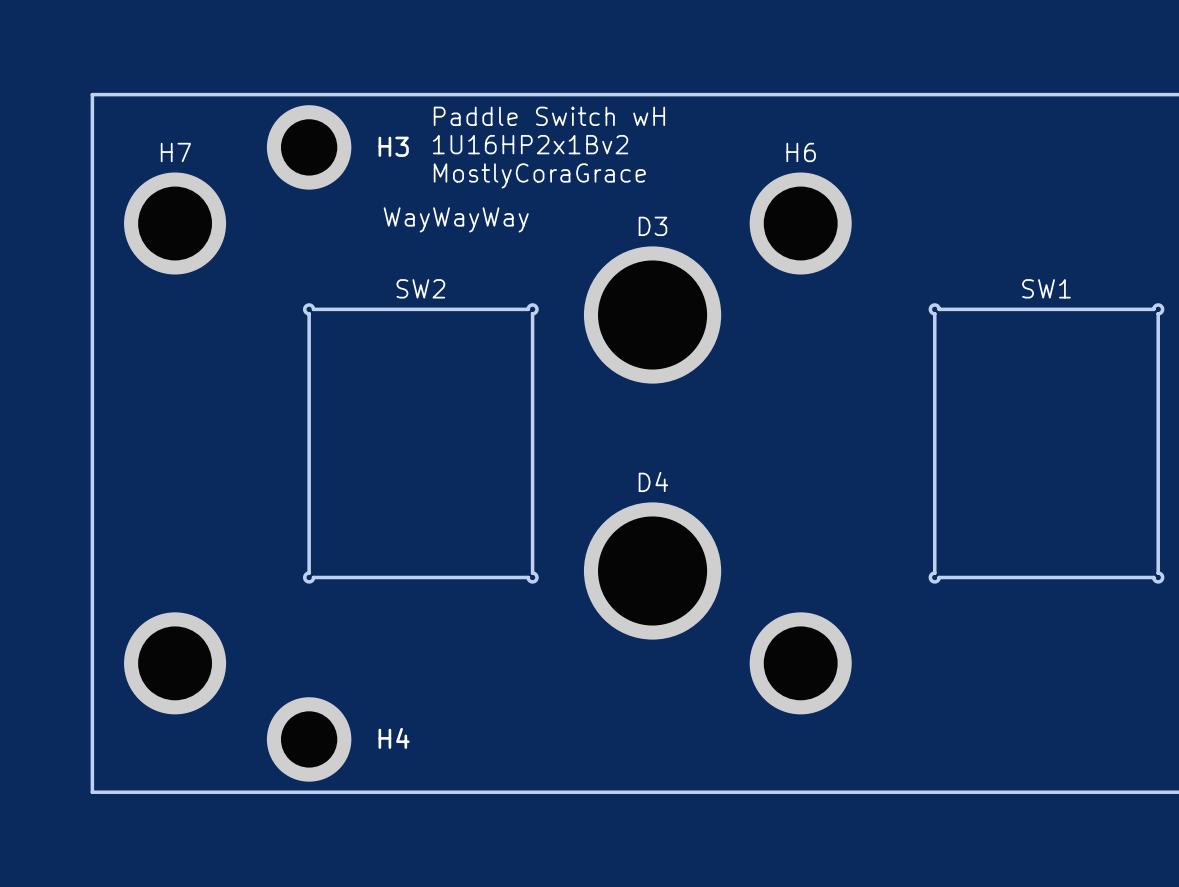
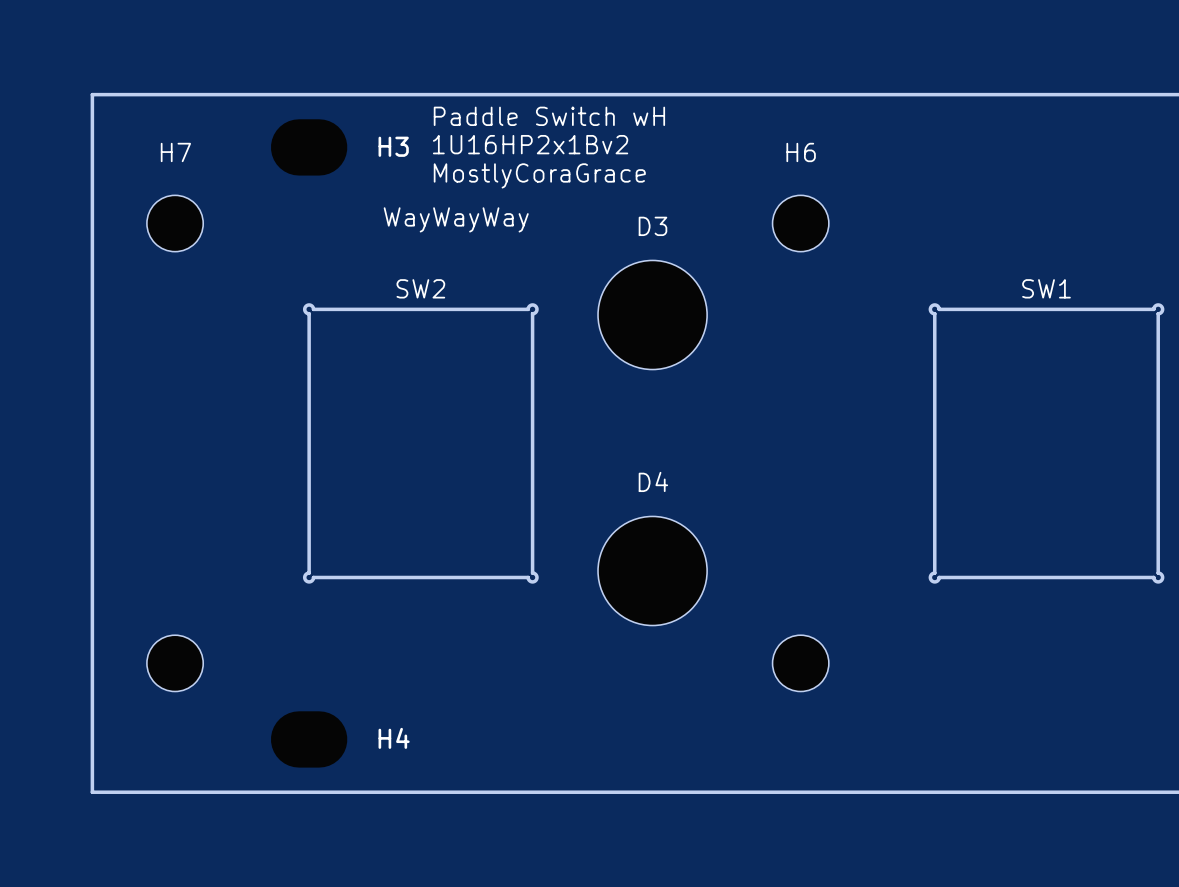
H3 footprint: [266, 105, 352, 190] -> [270, 119, 348, 176]
H7 footprint: [124, 172, 227, 715] -> [146, 195, 204, 692]
H6 footprint: [749, 172, 852, 715] -> [772, 195, 829, 692]
D3 footprint: [583, 246, 722, 384] -> [598, 260, 708, 370]
D4 footprint: [583, 502, 722, 640] -> [598, 516, 708, 626]
H4 footprint: [266, 697, 352, 782] -> [270, 711, 348, 768]

